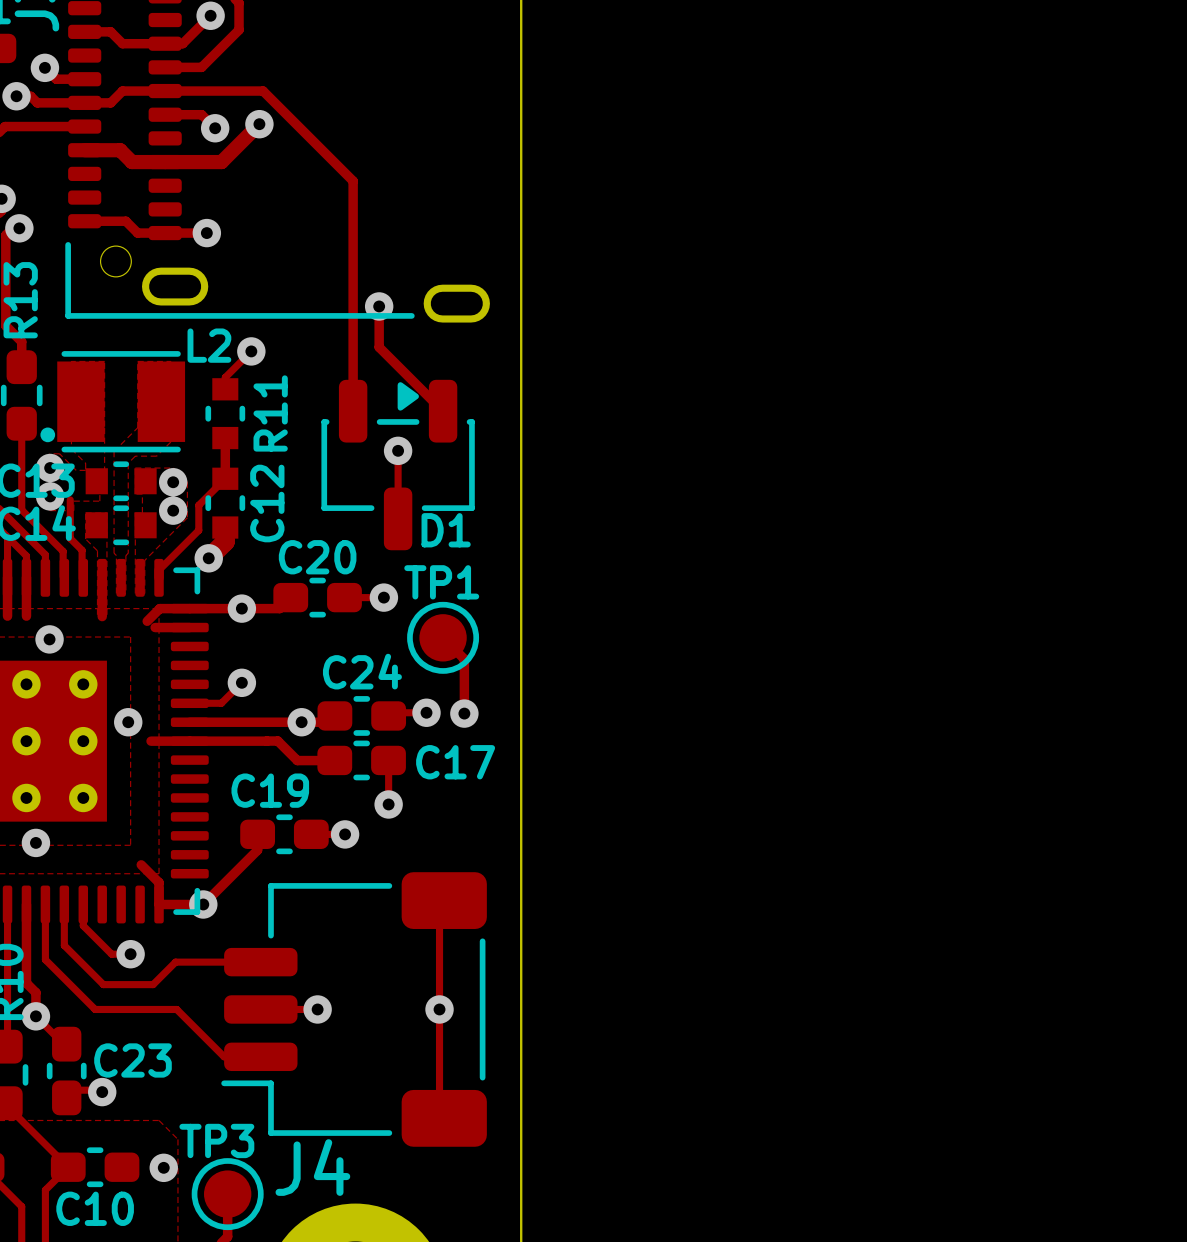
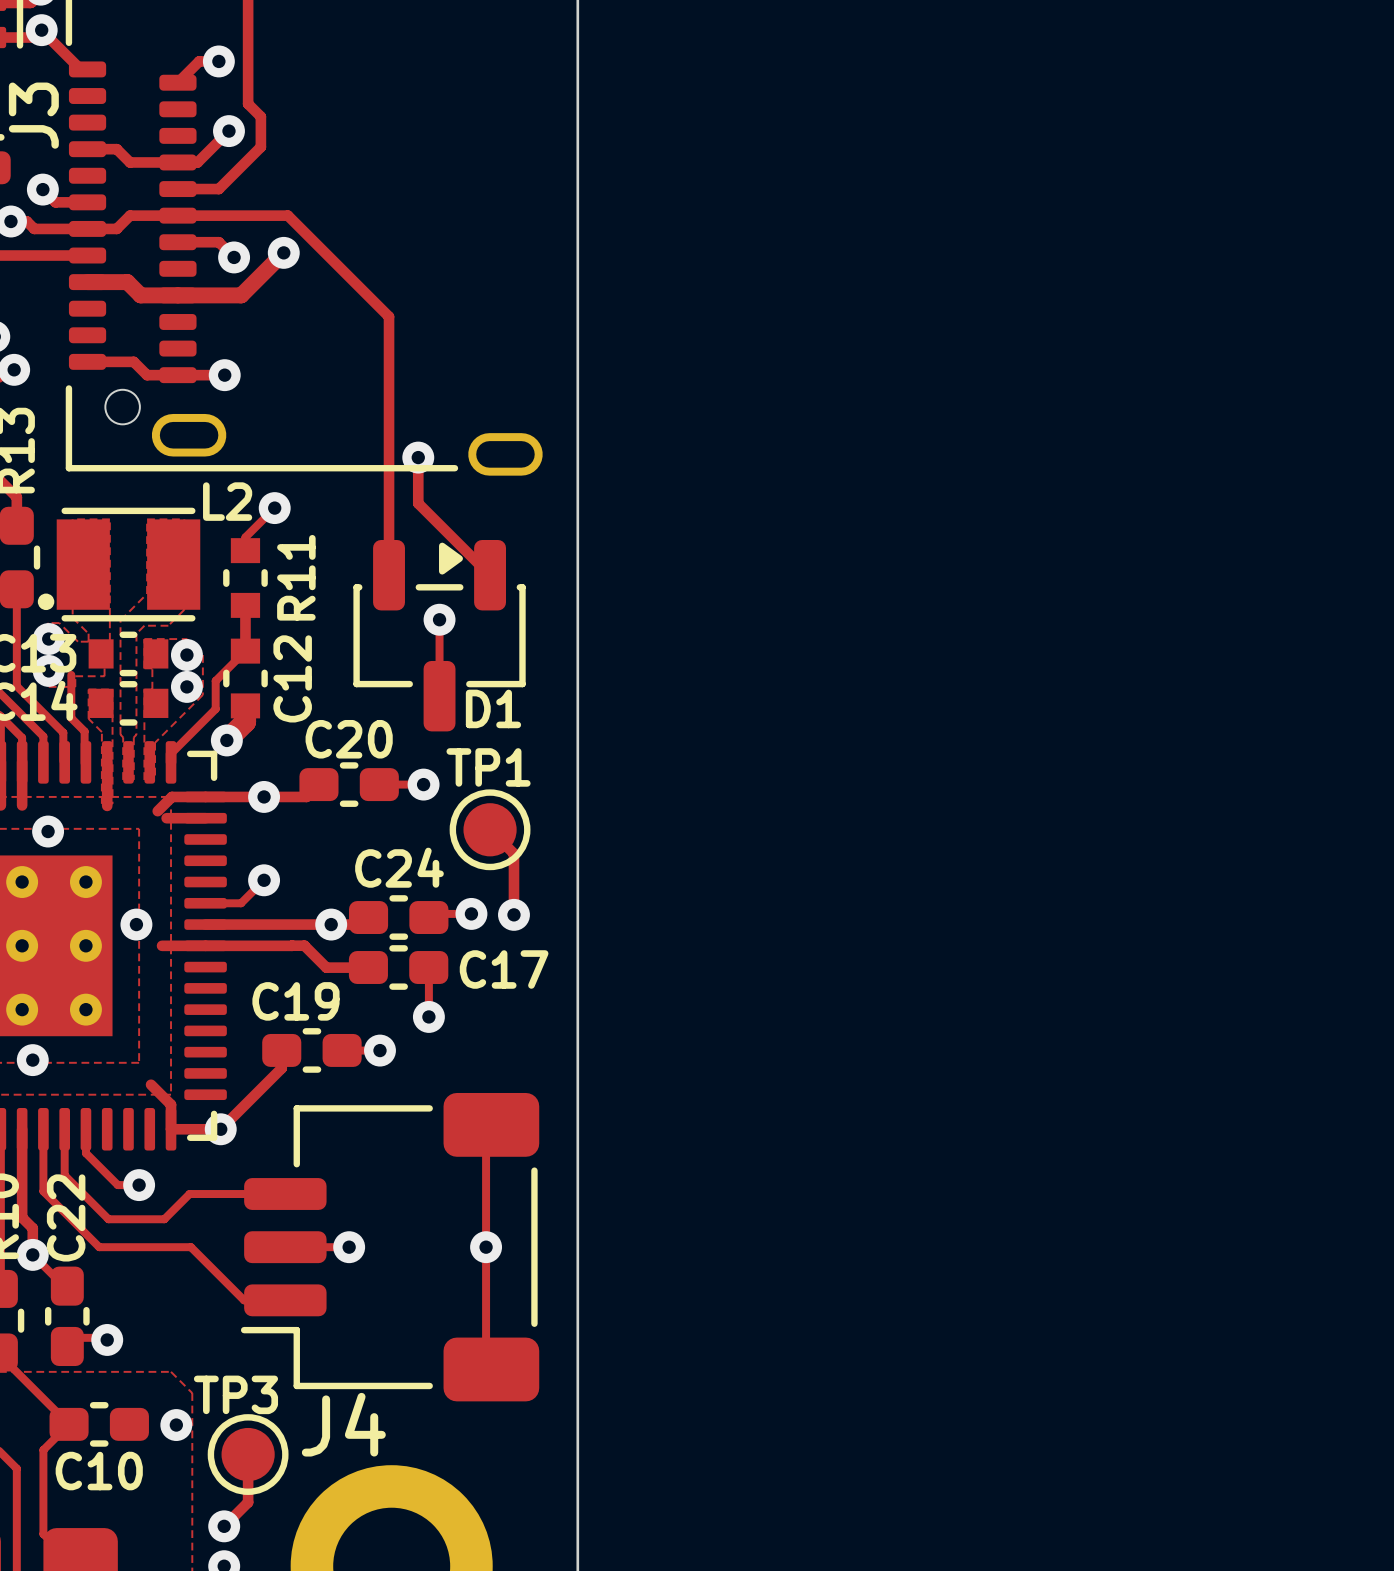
C23 name: C23 (132, 1060) -> C22 (66, 1217)

